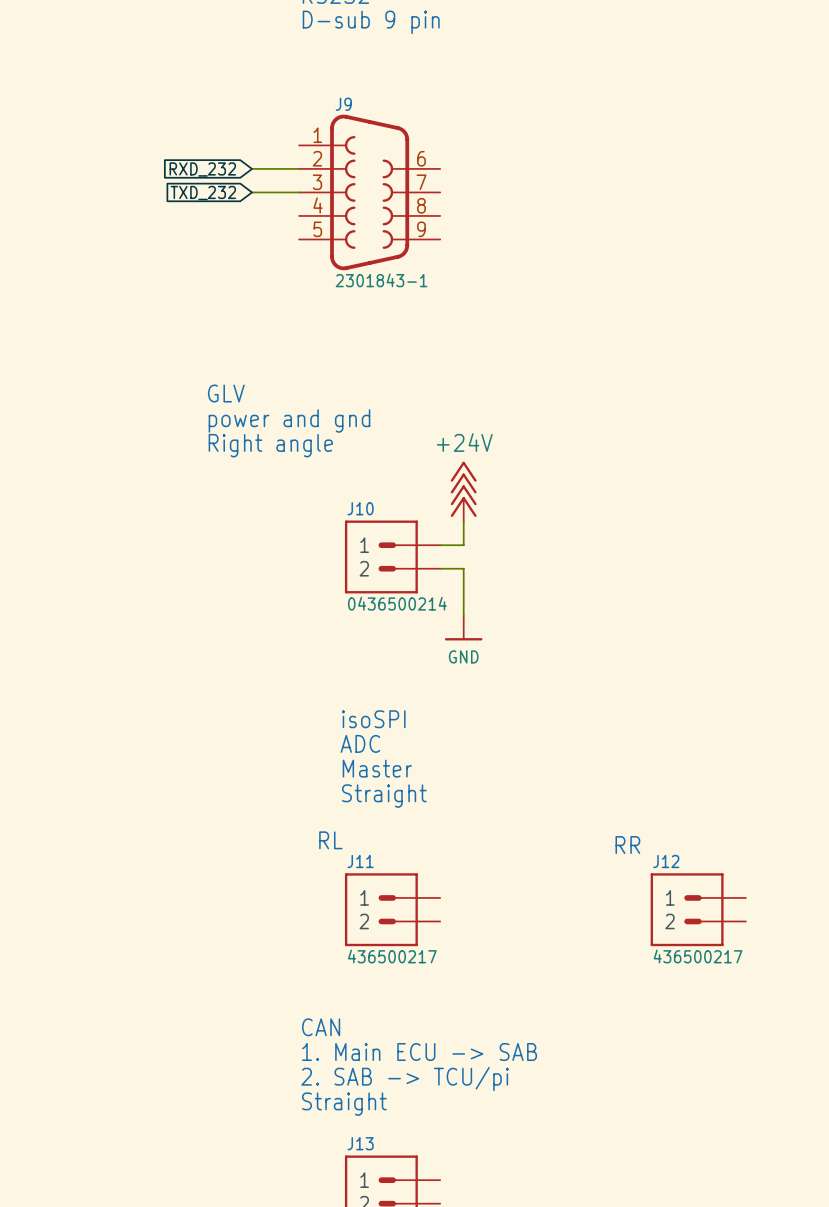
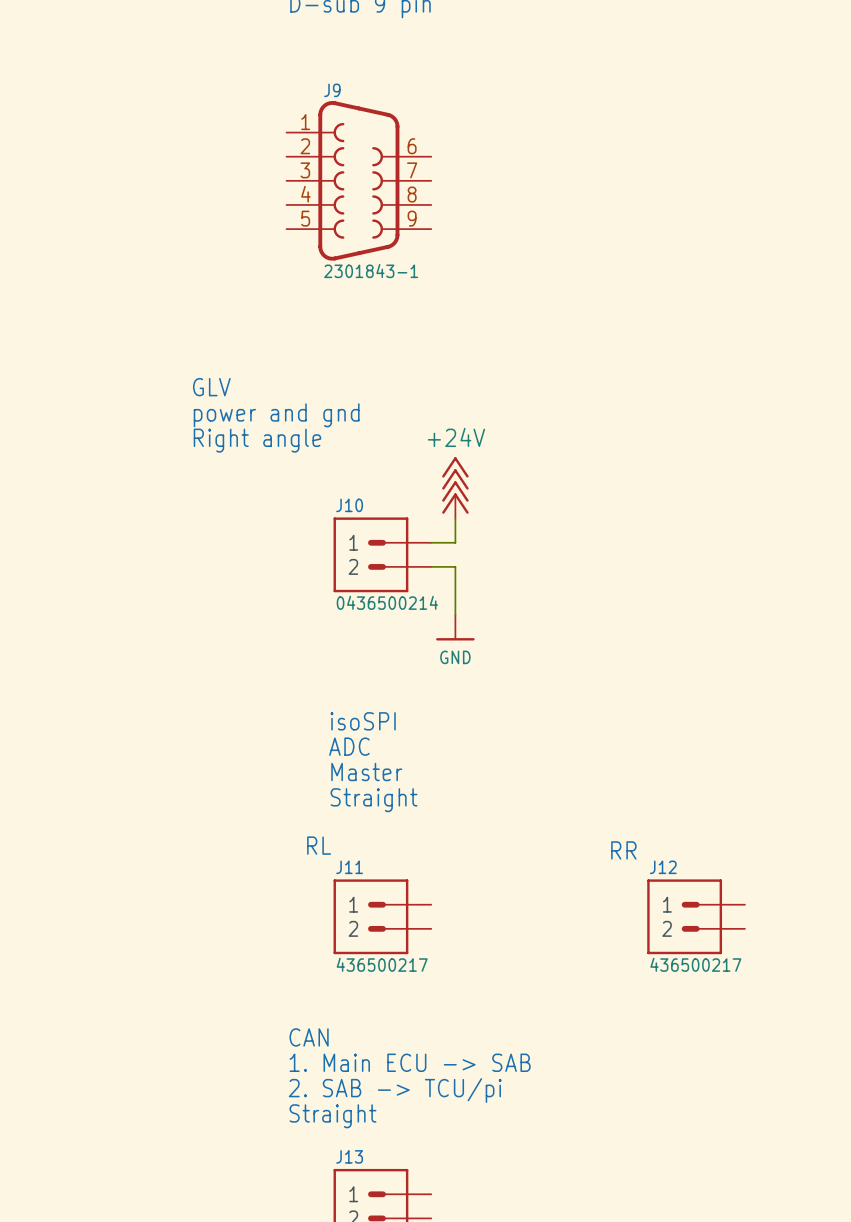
wire: (252, 168) (299, 168) -> none
global label: RXD_232 (202, 169) -> none
wire: (252, 192) (299, 192) -> none
global label: TXD_232 (203, 193) -> none

